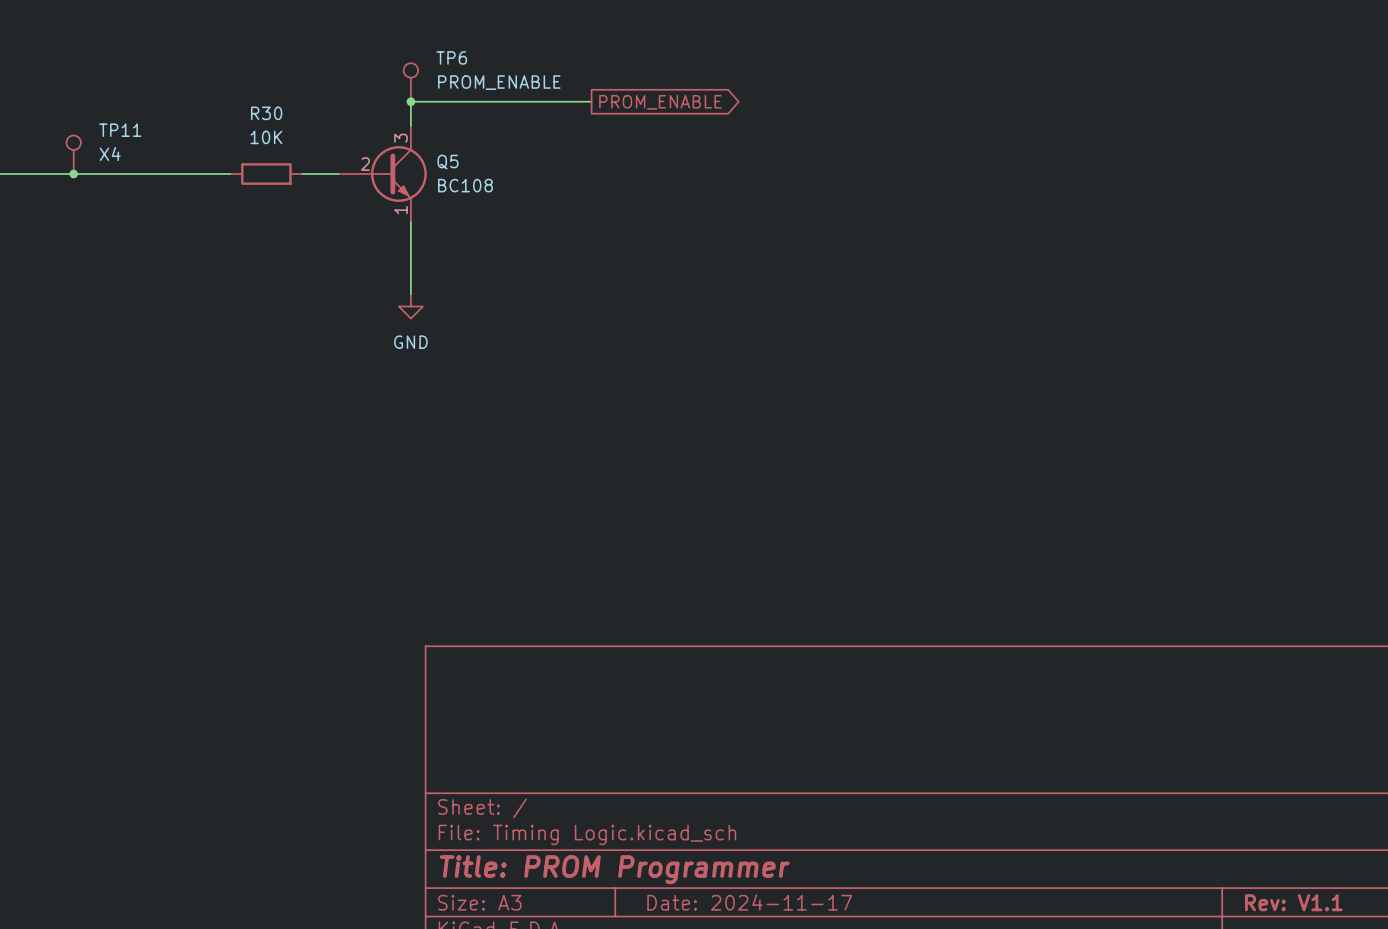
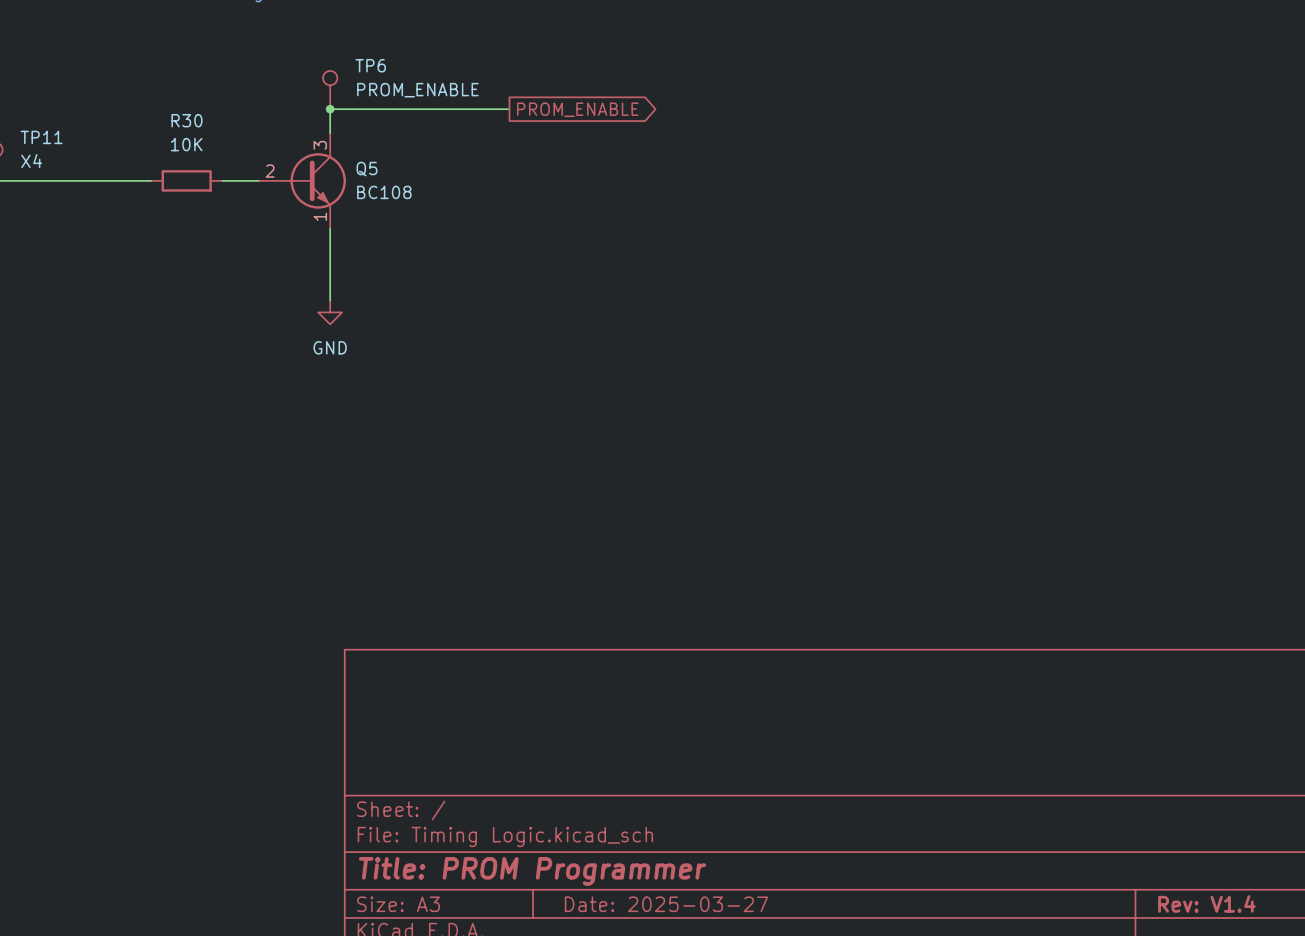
Q5 symbol: [338, 125, 427, 223] -> [258, 133, 346, 229]
title block: Date: 2024-11-17 (749, 902) -> Date: 2025-03-27 (666, 904)
title block: Rev: V1.1 (1293, 902) -> Rev: V1.4 (1206, 903)

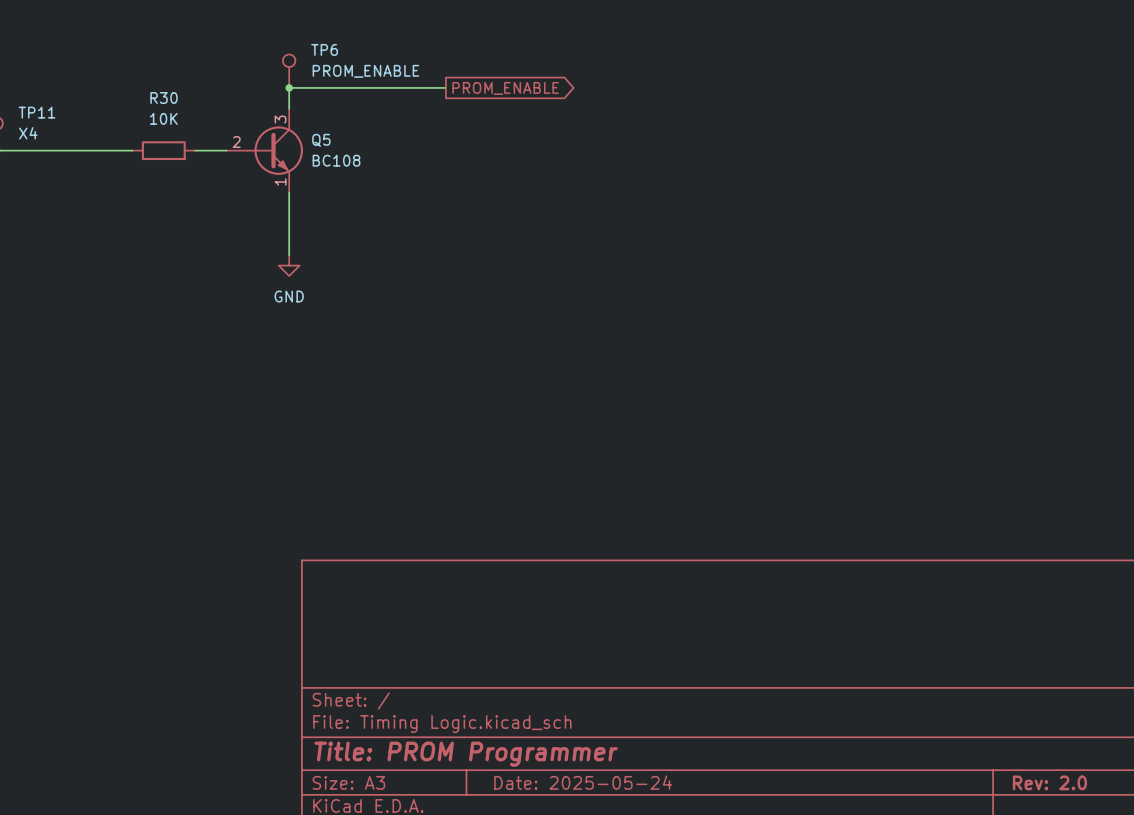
title block: Rev: V1.4 (1206, 903) -> Rev: 2.0 (1049, 782)
title block: Date: 2025-03-27 (666, 904) -> Date: 2025-05-24 (583, 782)

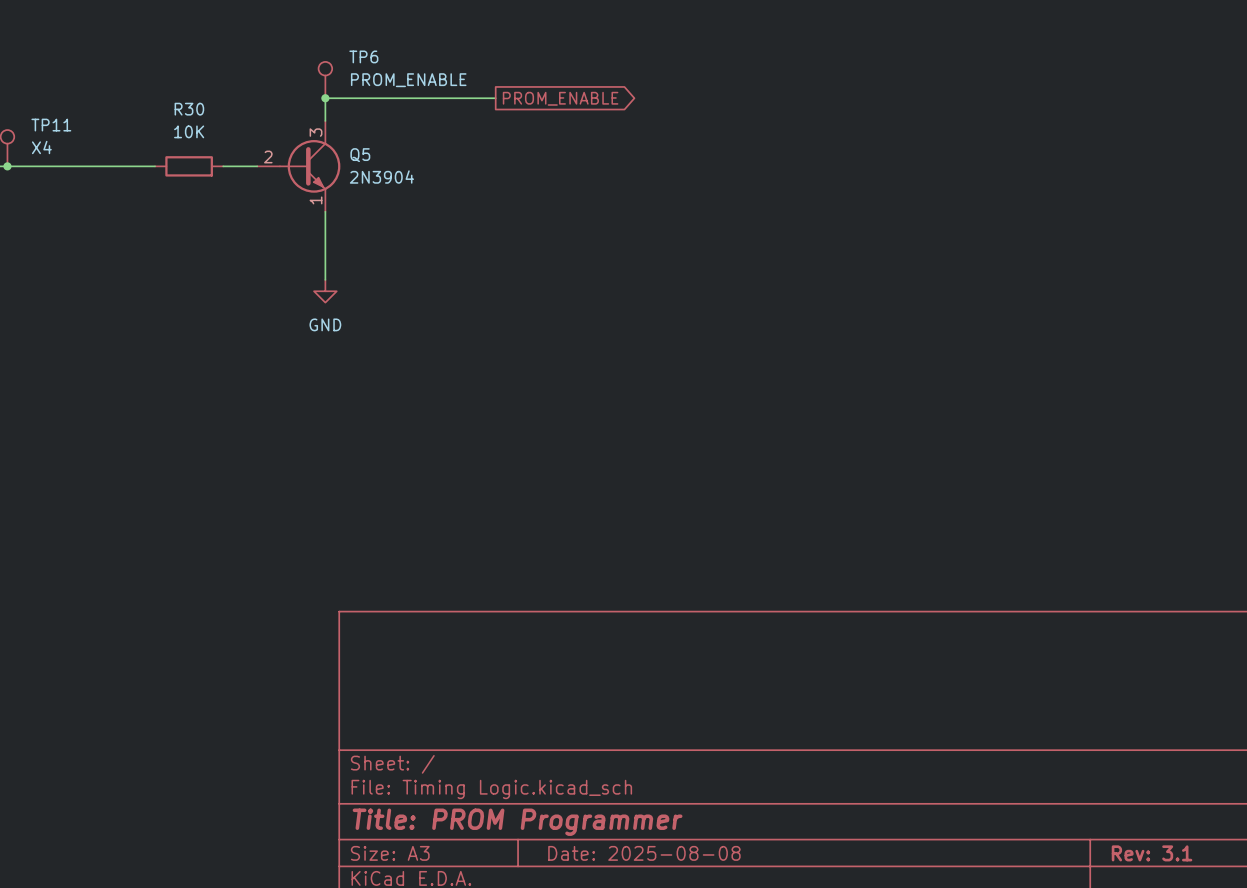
Q5 value: BC108 (336, 160) -> 2N3904 (381, 177)
title block: Date: 2025-05-24 (583, 782) -> Date: 2025-08-08 (644, 853)
title block: Rev: 2.0 (1049, 782) -> Rev: 3.1 (1152, 853)

